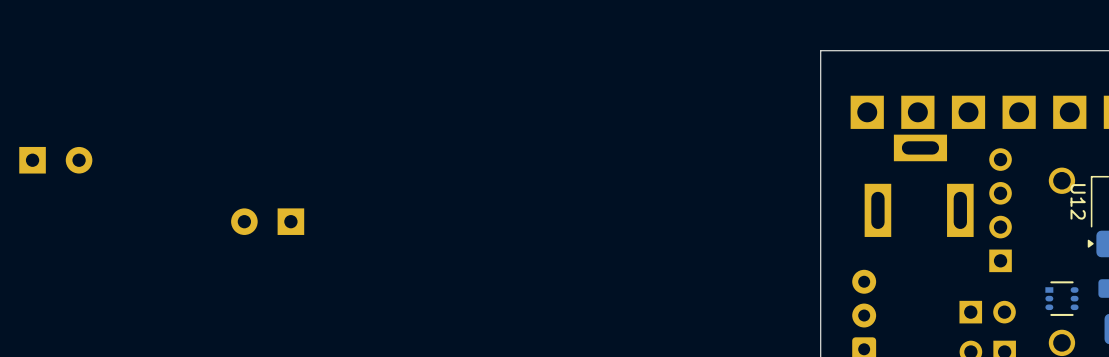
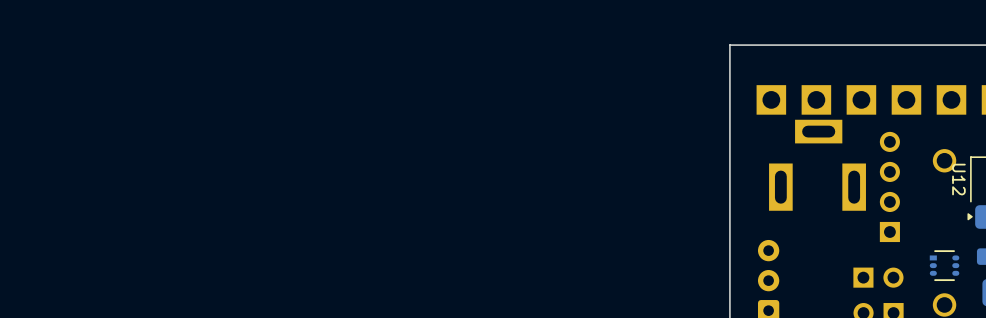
part: (55, 160) -> none
part: (267, 221) -> none

